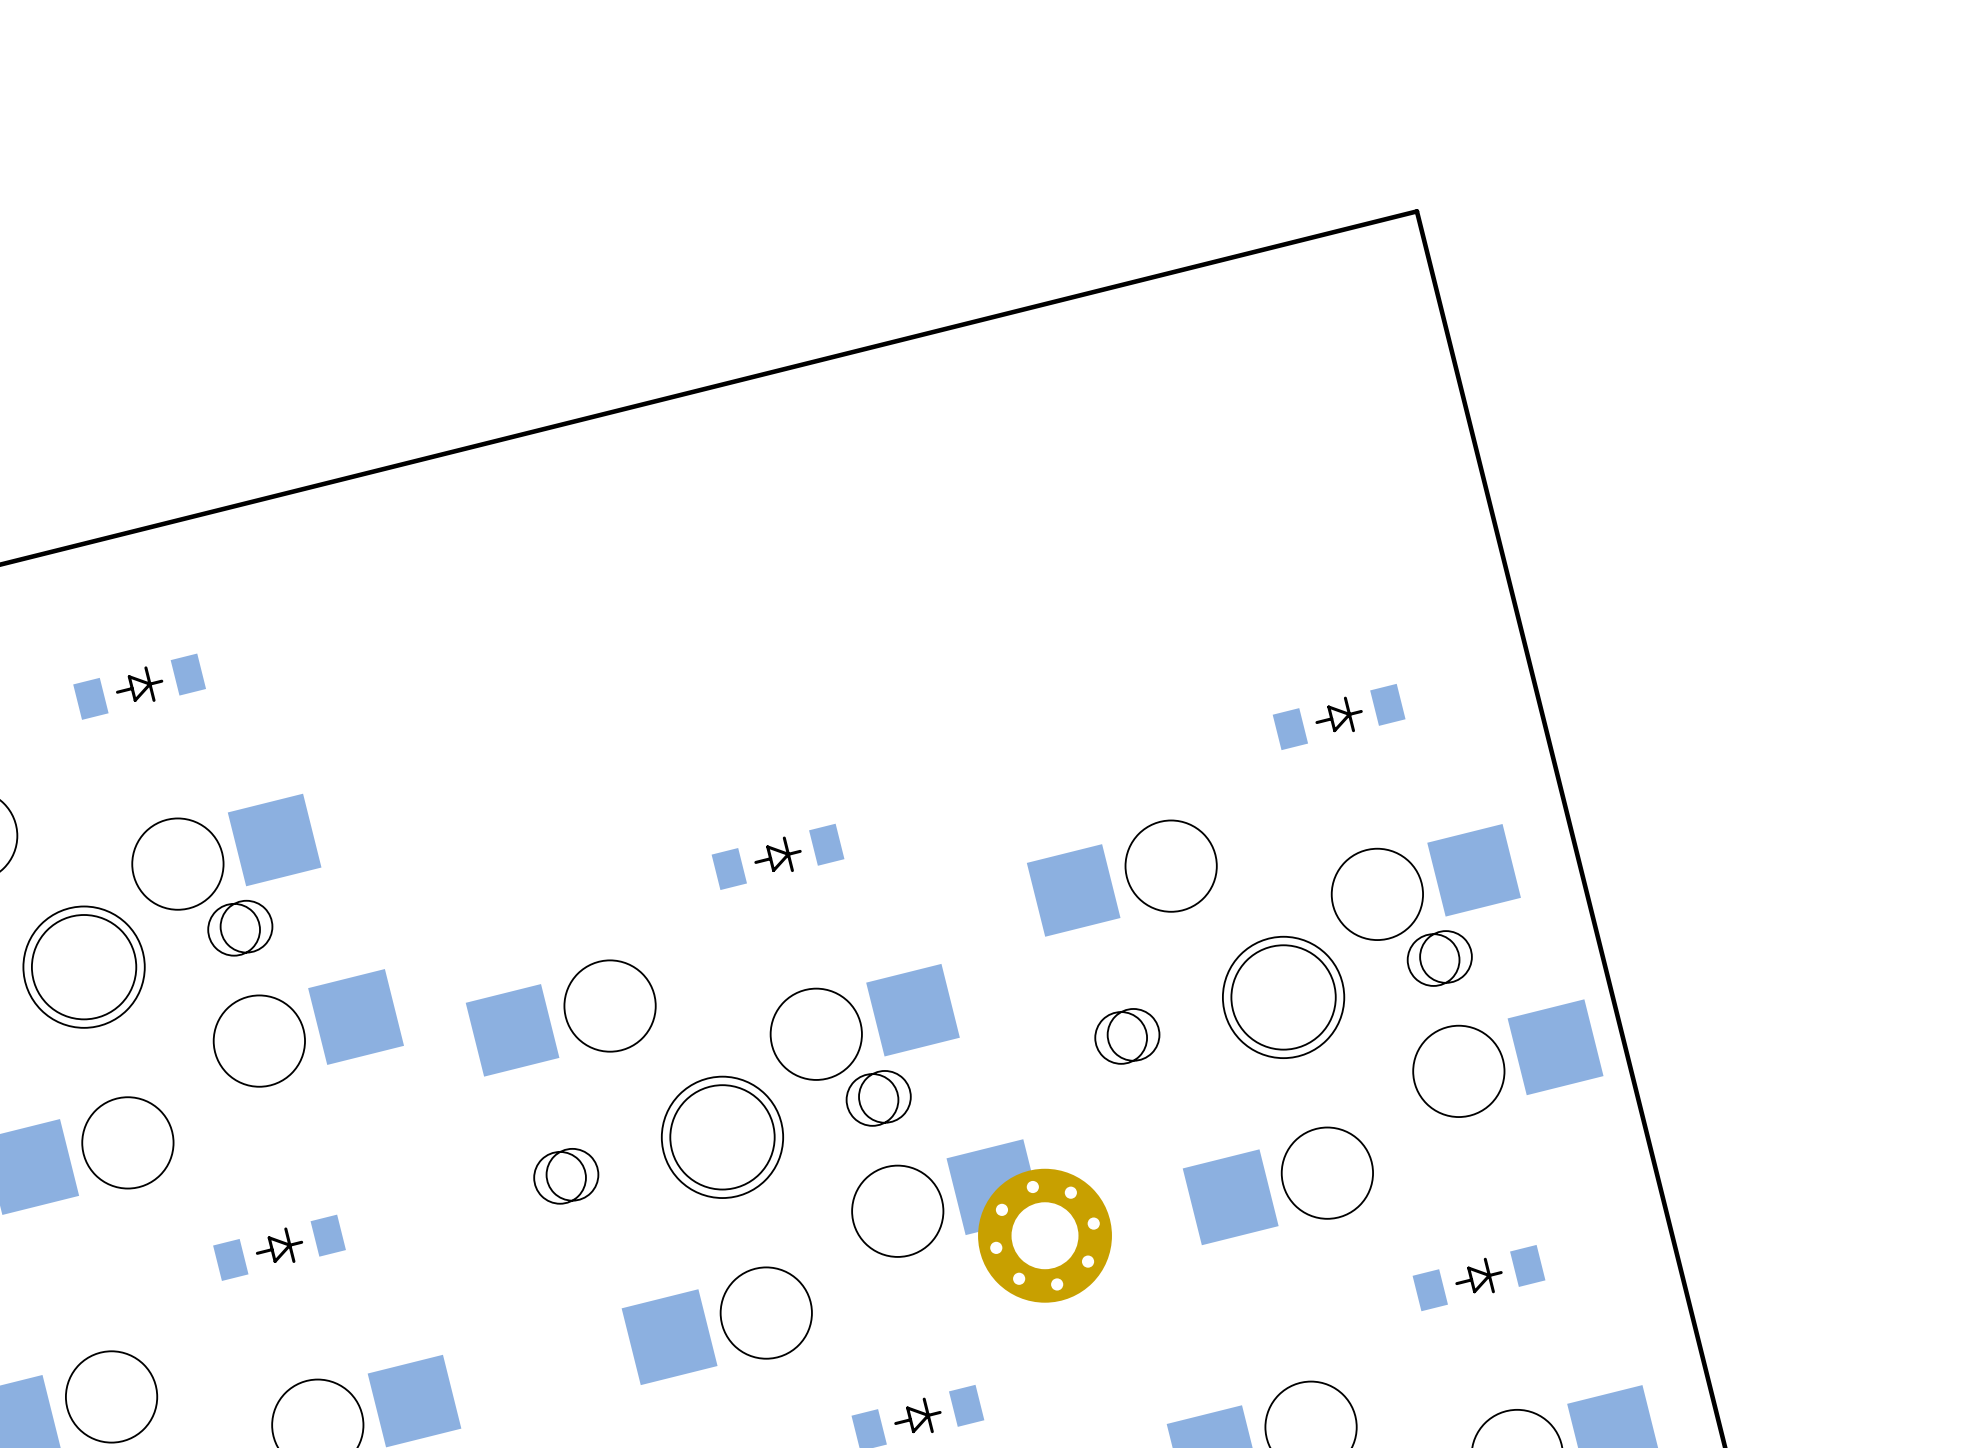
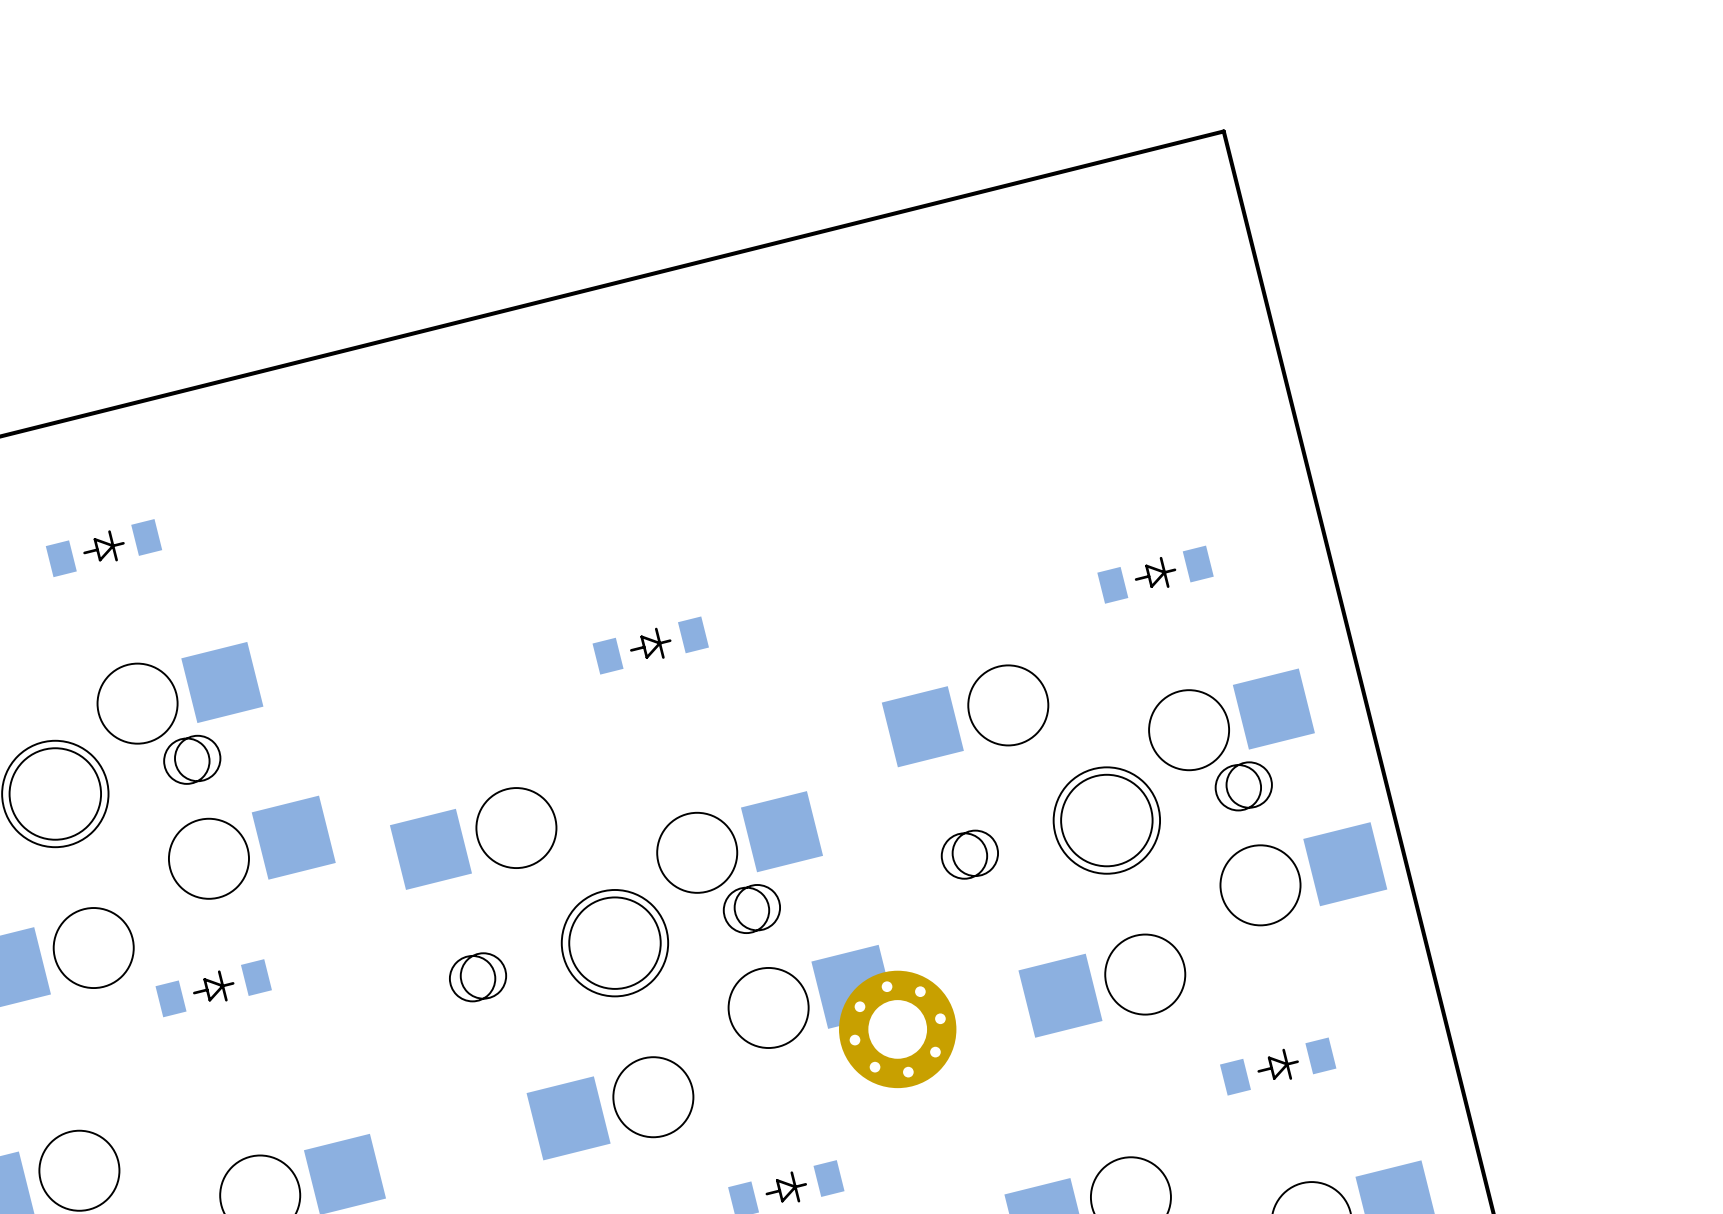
part position: (778, 856) -> (650, 645)
part position: (279, 1247) -> (213, 988)

